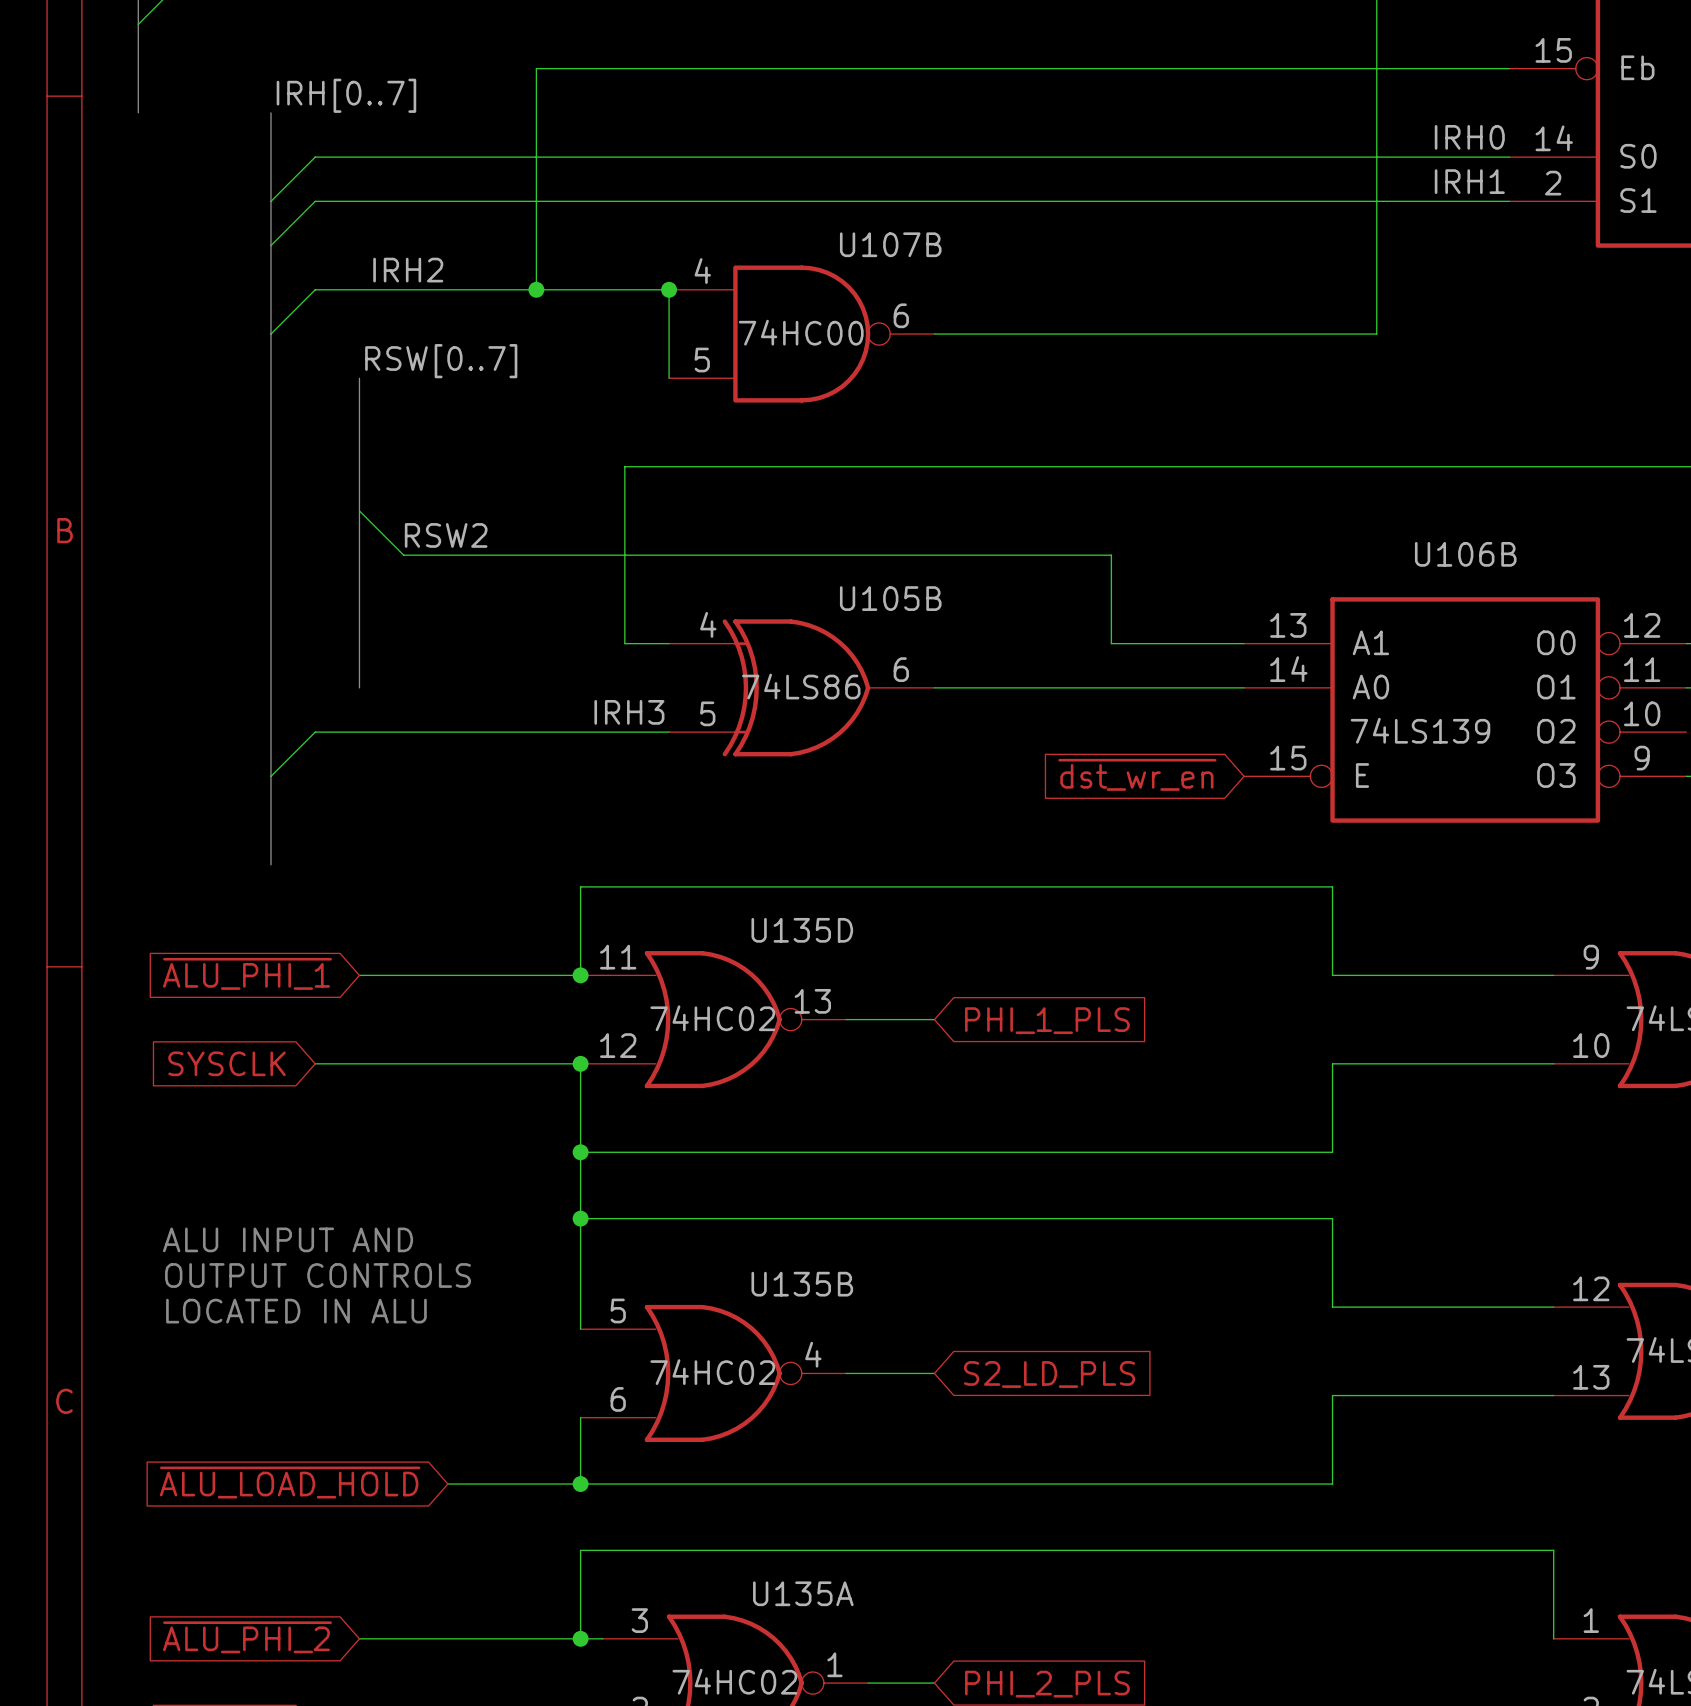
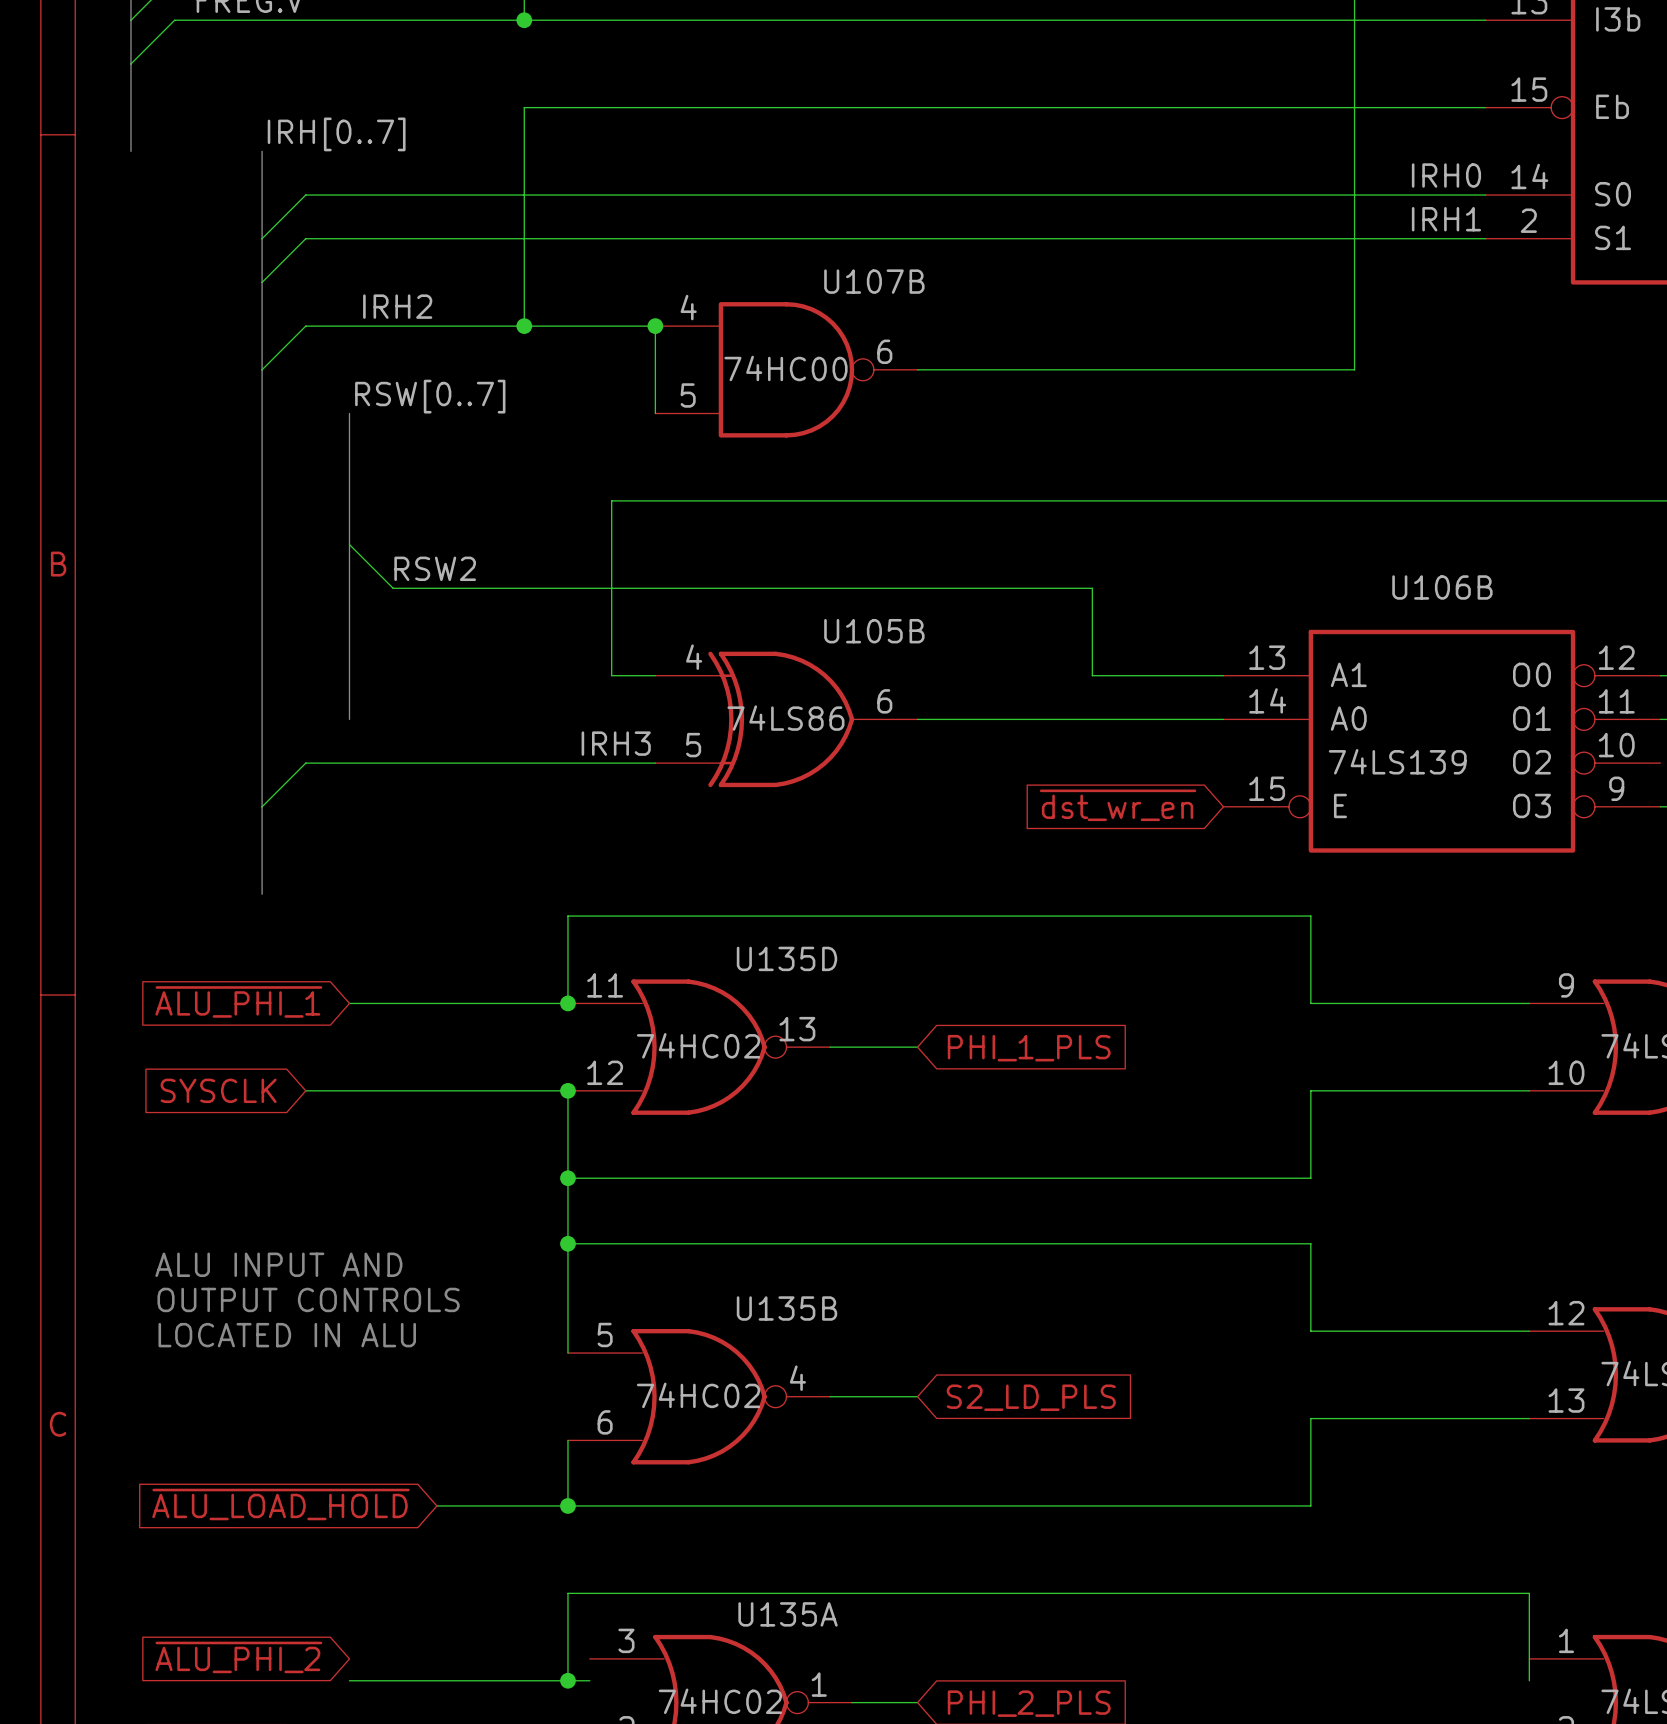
wire: (580, 1572) (580, 1550) (1553, 1550) (1553, 1572) -> (567, 1593) (1529, 1593)
wire: (359, 1638) (602, 1638) -> (349, 1680) (589, 1680)
wire: none -> (567, 1658) (567, 1680)
junction position: (580, 1638) -> (567, 1680)
wire: none -> (1529, 1658) (1529, 1680)

